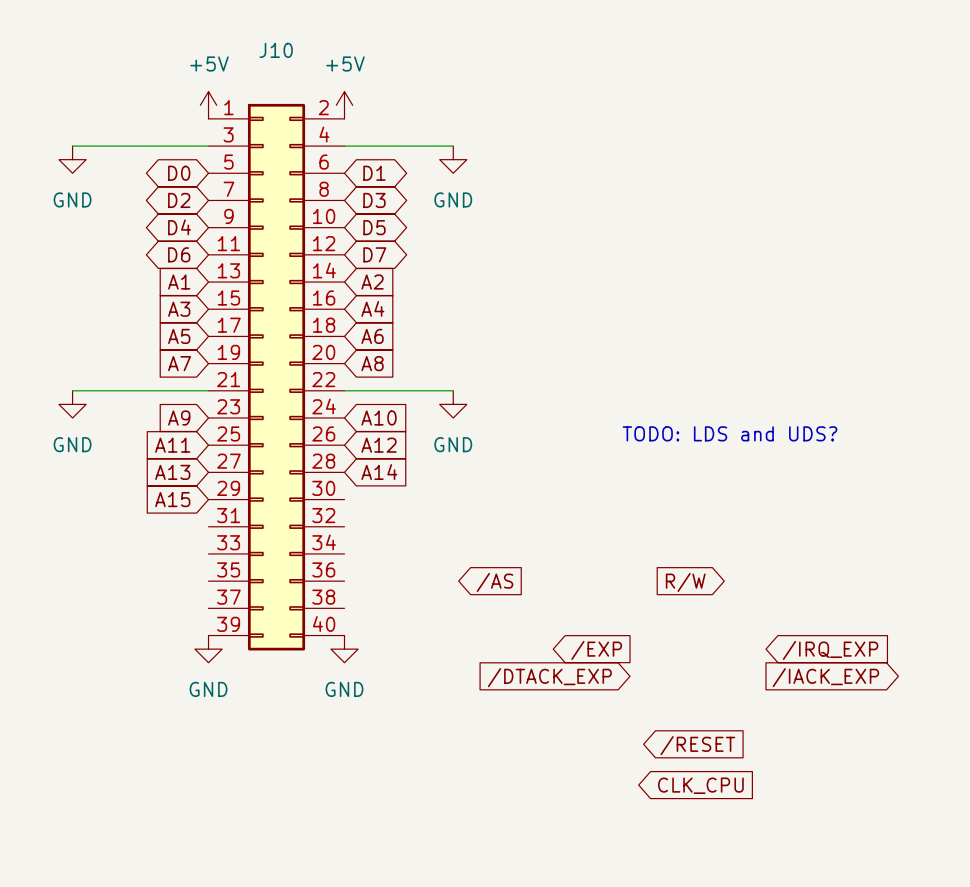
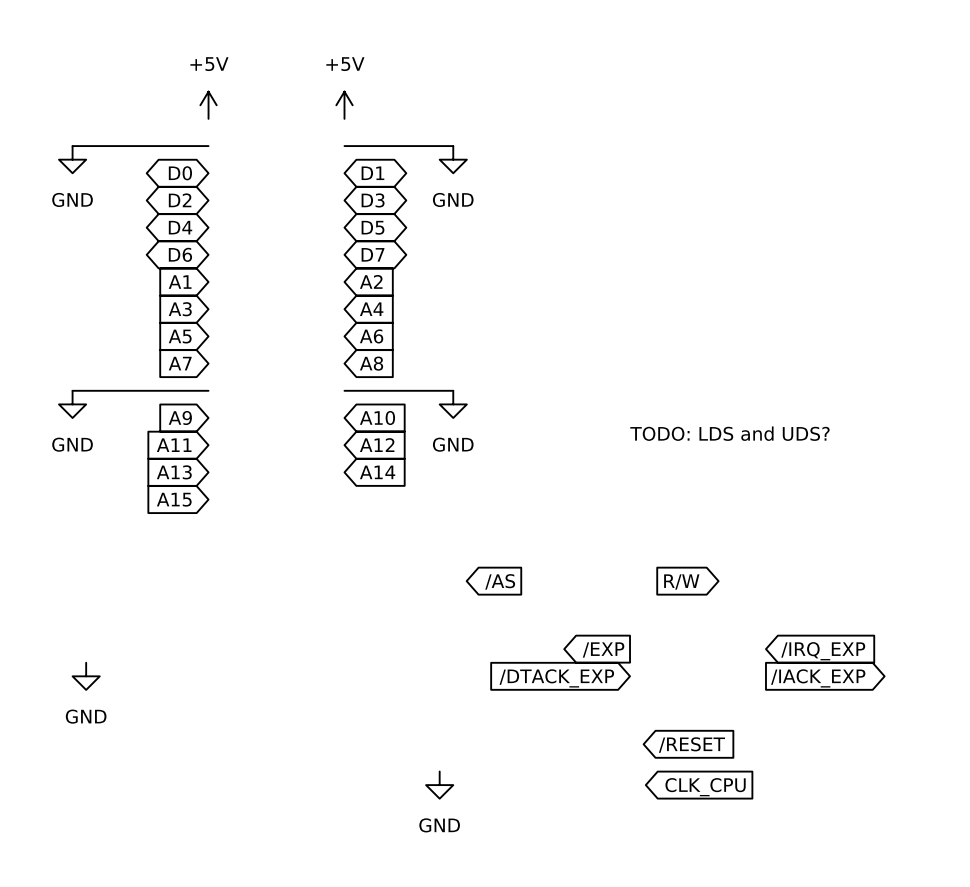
J10: (276, 377) -> none
power symbol position: GND (208, 649) -> GND (86, 676)
power symbol: GND (344, 649) -> none
power symbol: none -> GND (439, 785)

